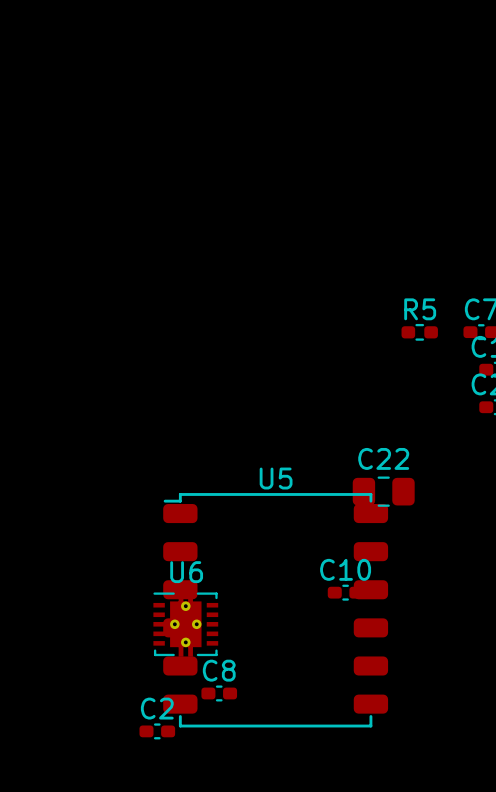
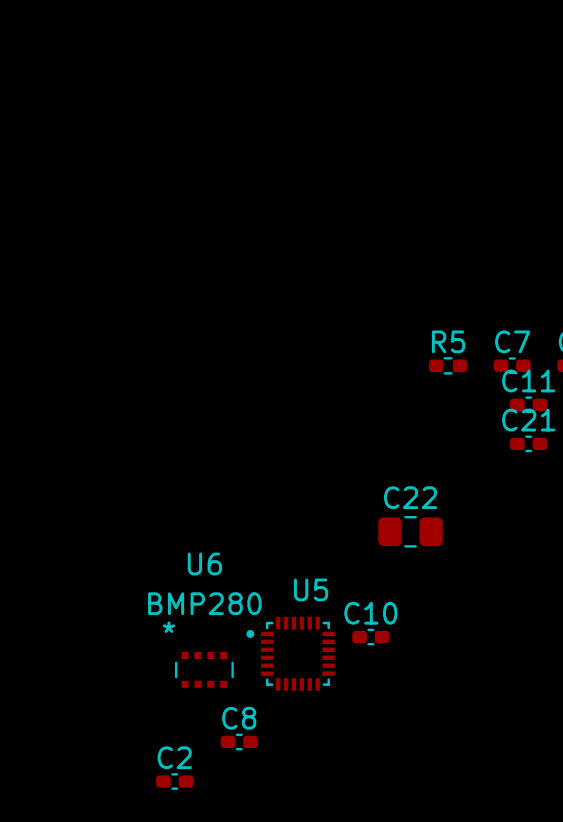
U5 name position: U5 (276, 478) -> U5 (311, 589)
U5 footprint: [163, 493, 389, 728] -> [246, 616, 335, 691]
U6 value: none -> BMP280 (204, 603)
U6 name position: U6 (186, 572) -> U6 (204, 564)
U6 footprint: [153, 591, 219, 657] -> [174, 652, 234, 688]

